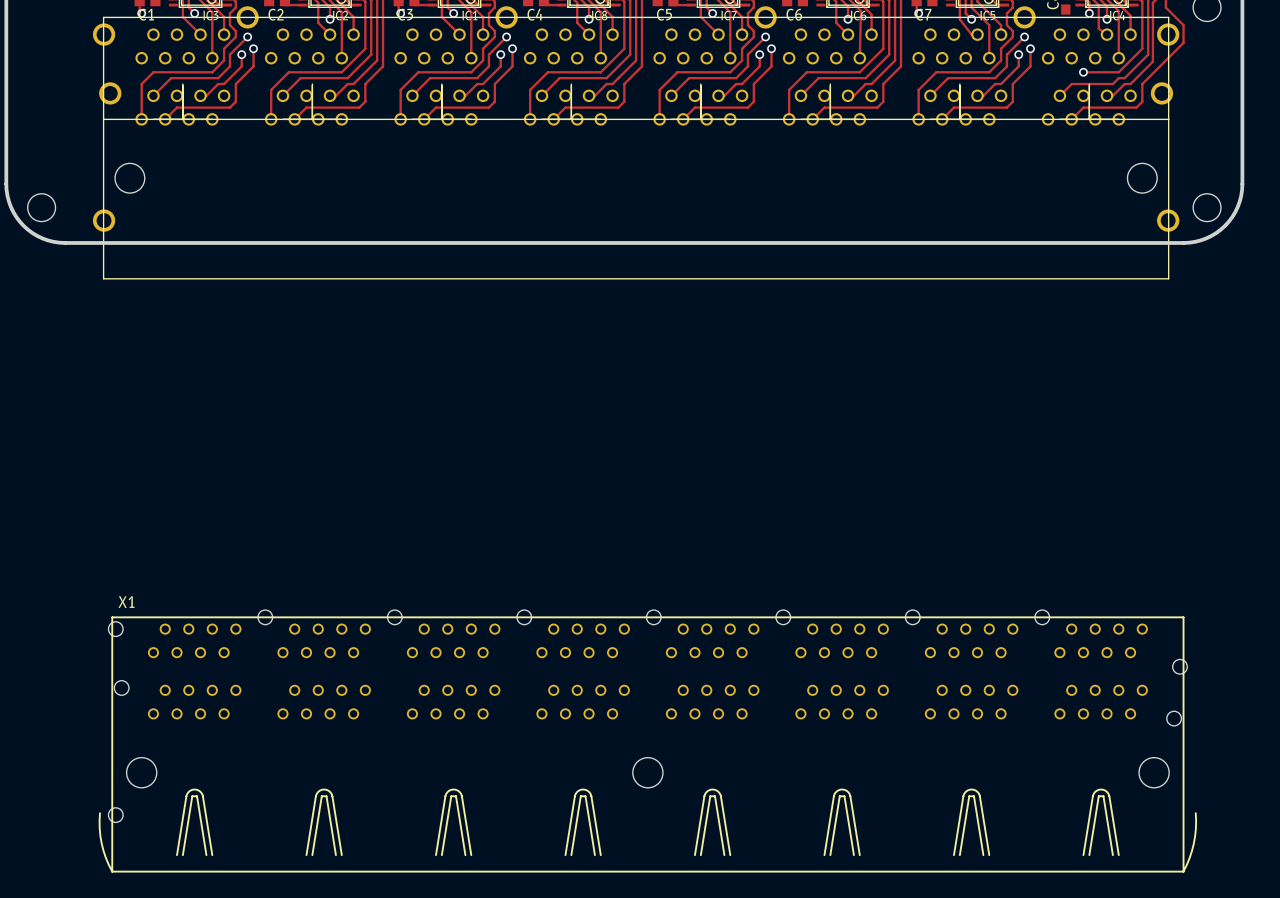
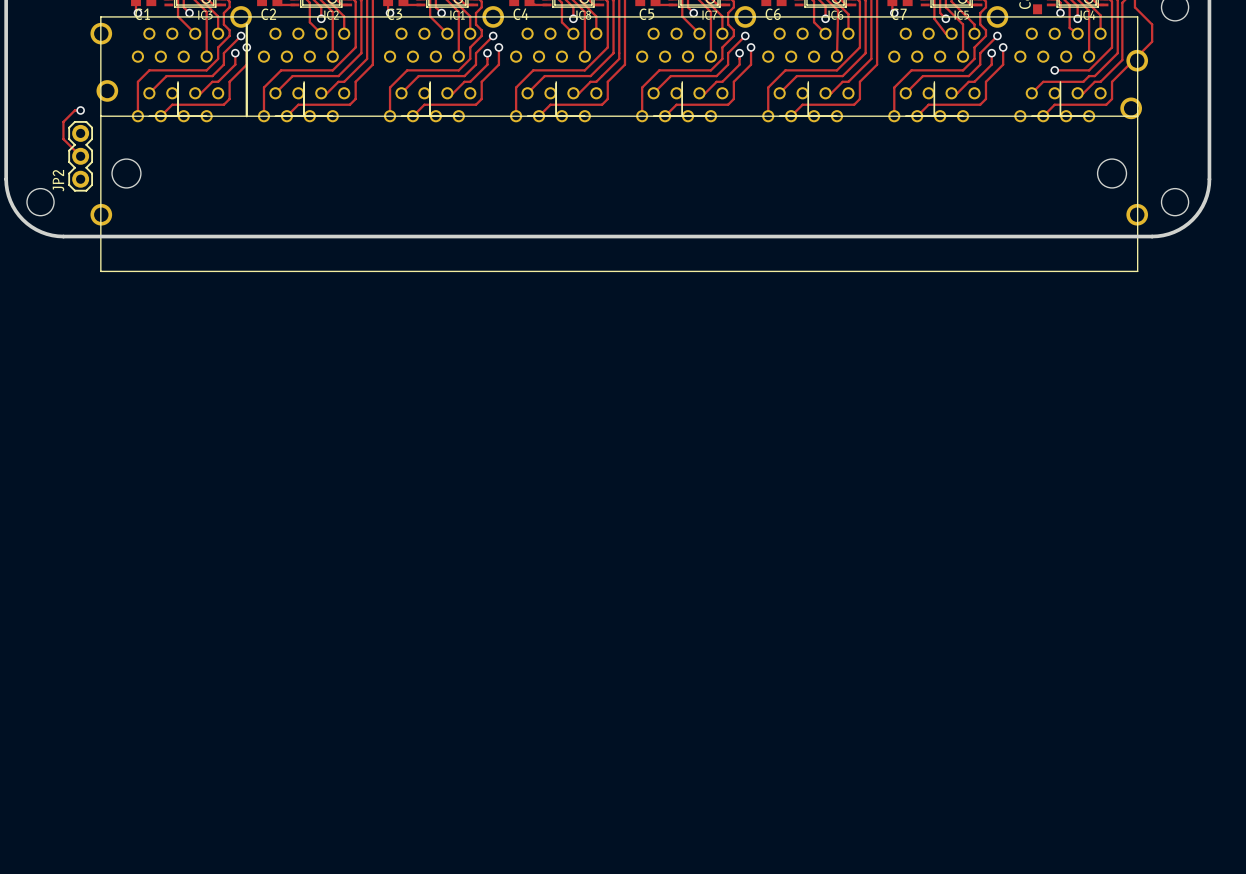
part footprint: [92, 6, 1180, 280] -> [90, 6, 1149, 272]
line: none -> (246, 24) (246, 116)
track: none -> (80, 110) (74, 110) (63, 121) (63, 139) (80, 156)
via: none -> (80, 110)
JP2: none -> (80, 156)
X1: (647, 741) -> none

